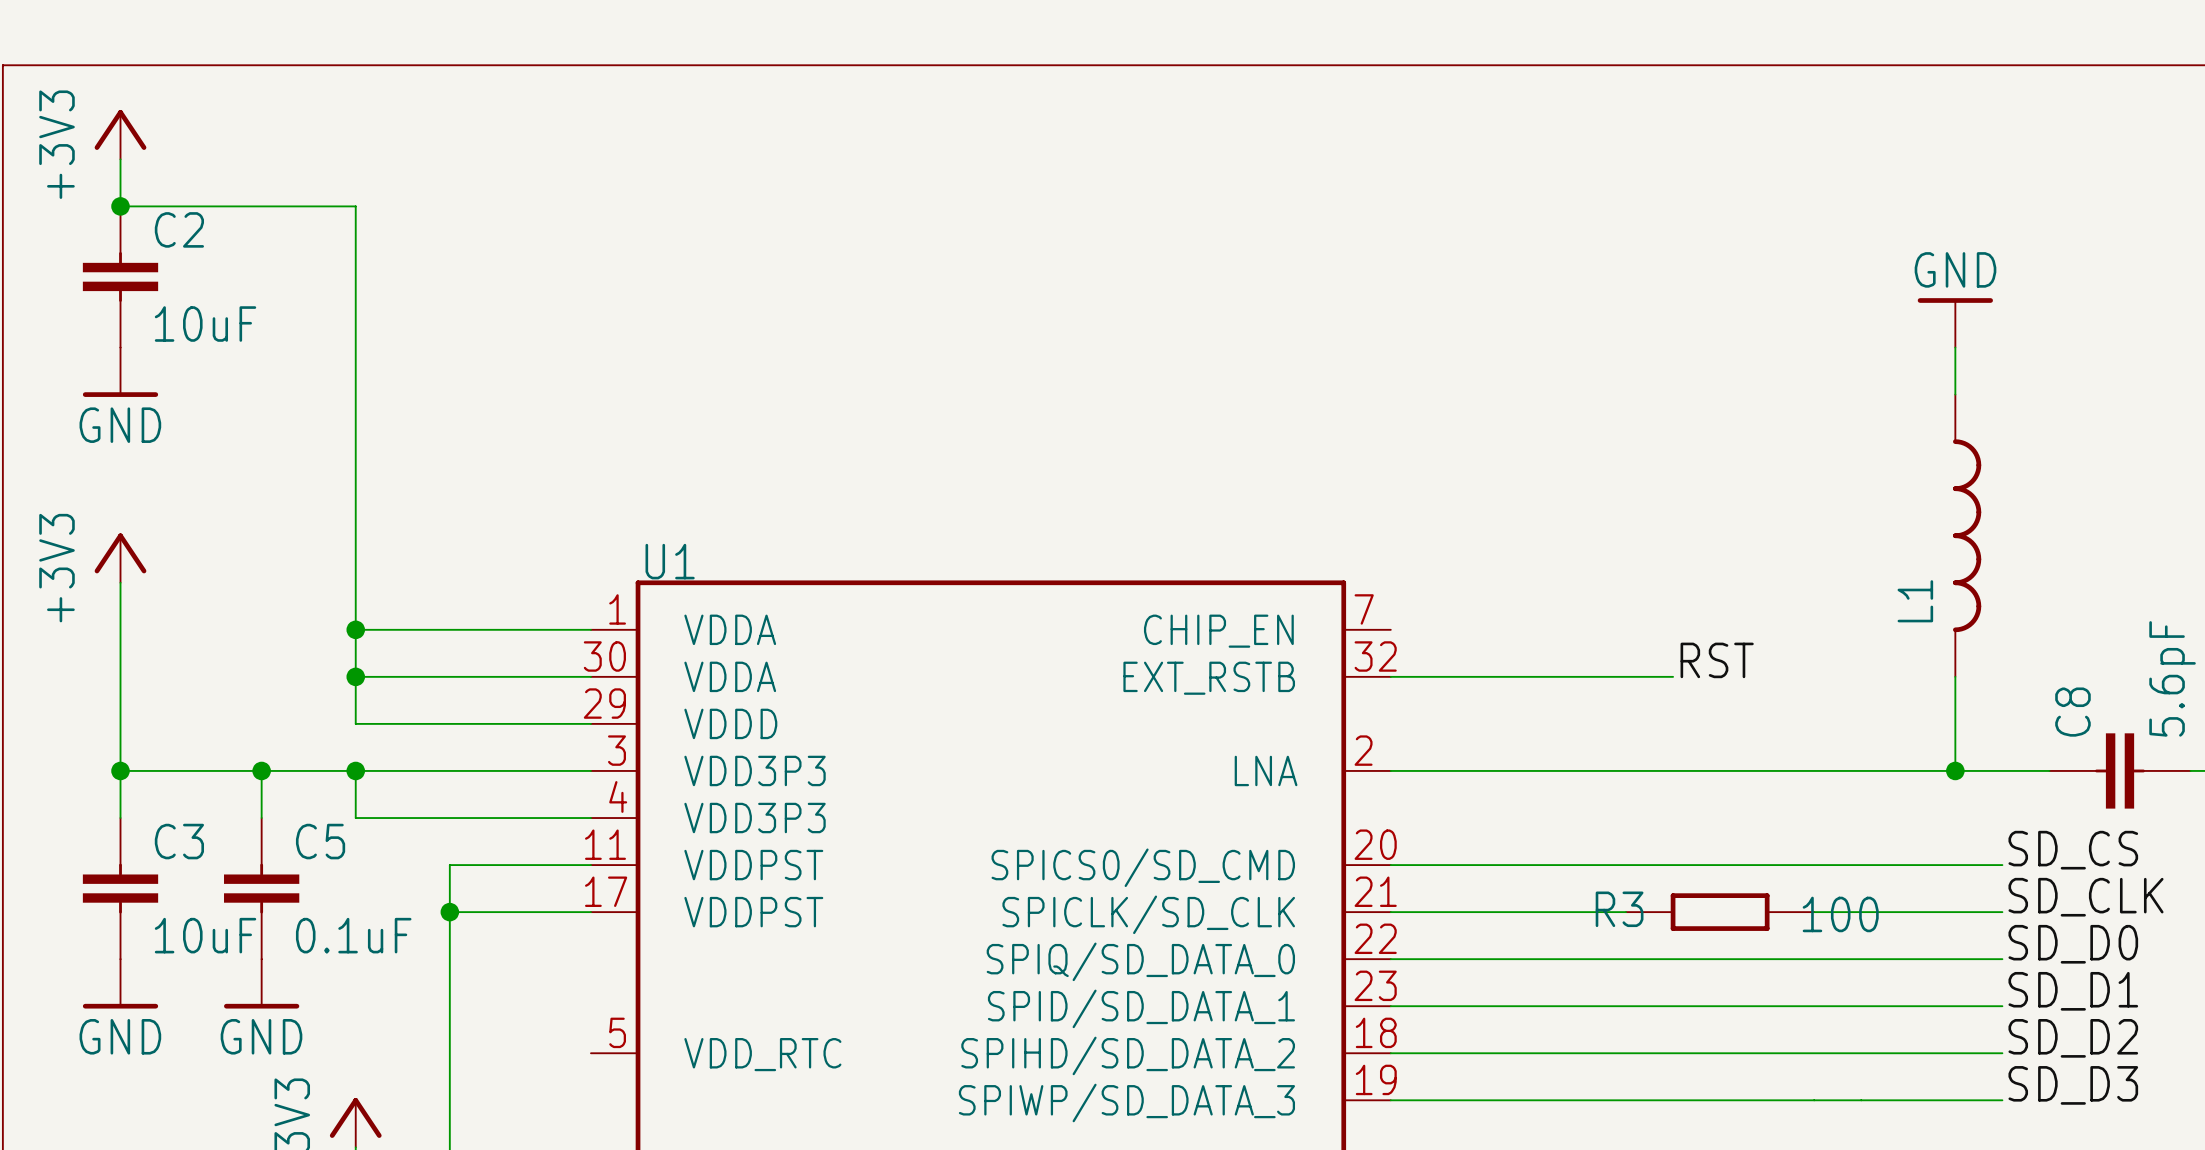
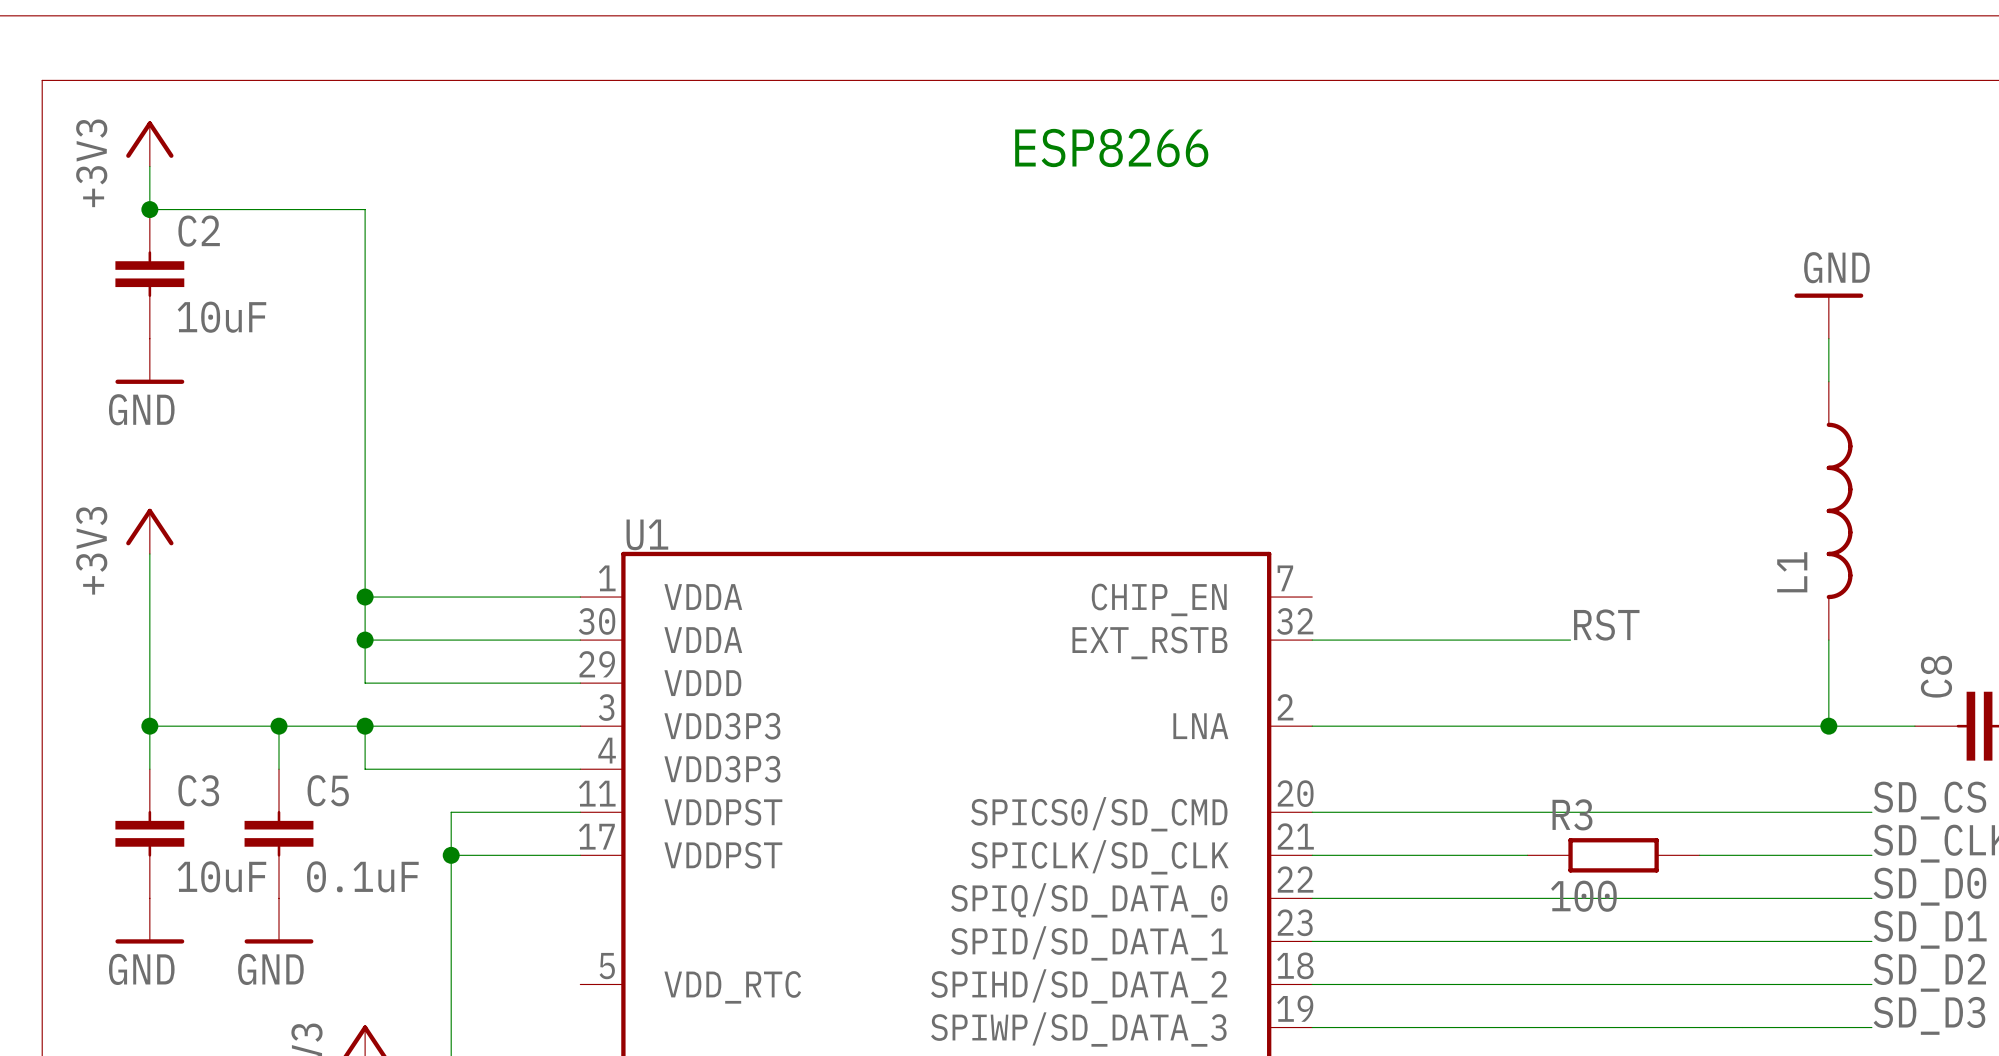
text: none -> ESP8266 (1111, 148)
R3 name position: R3 (1619, 909) -> R3 (1572, 814)
R3 value position: 100 (1840, 914) -> 100 (1583, 896)

